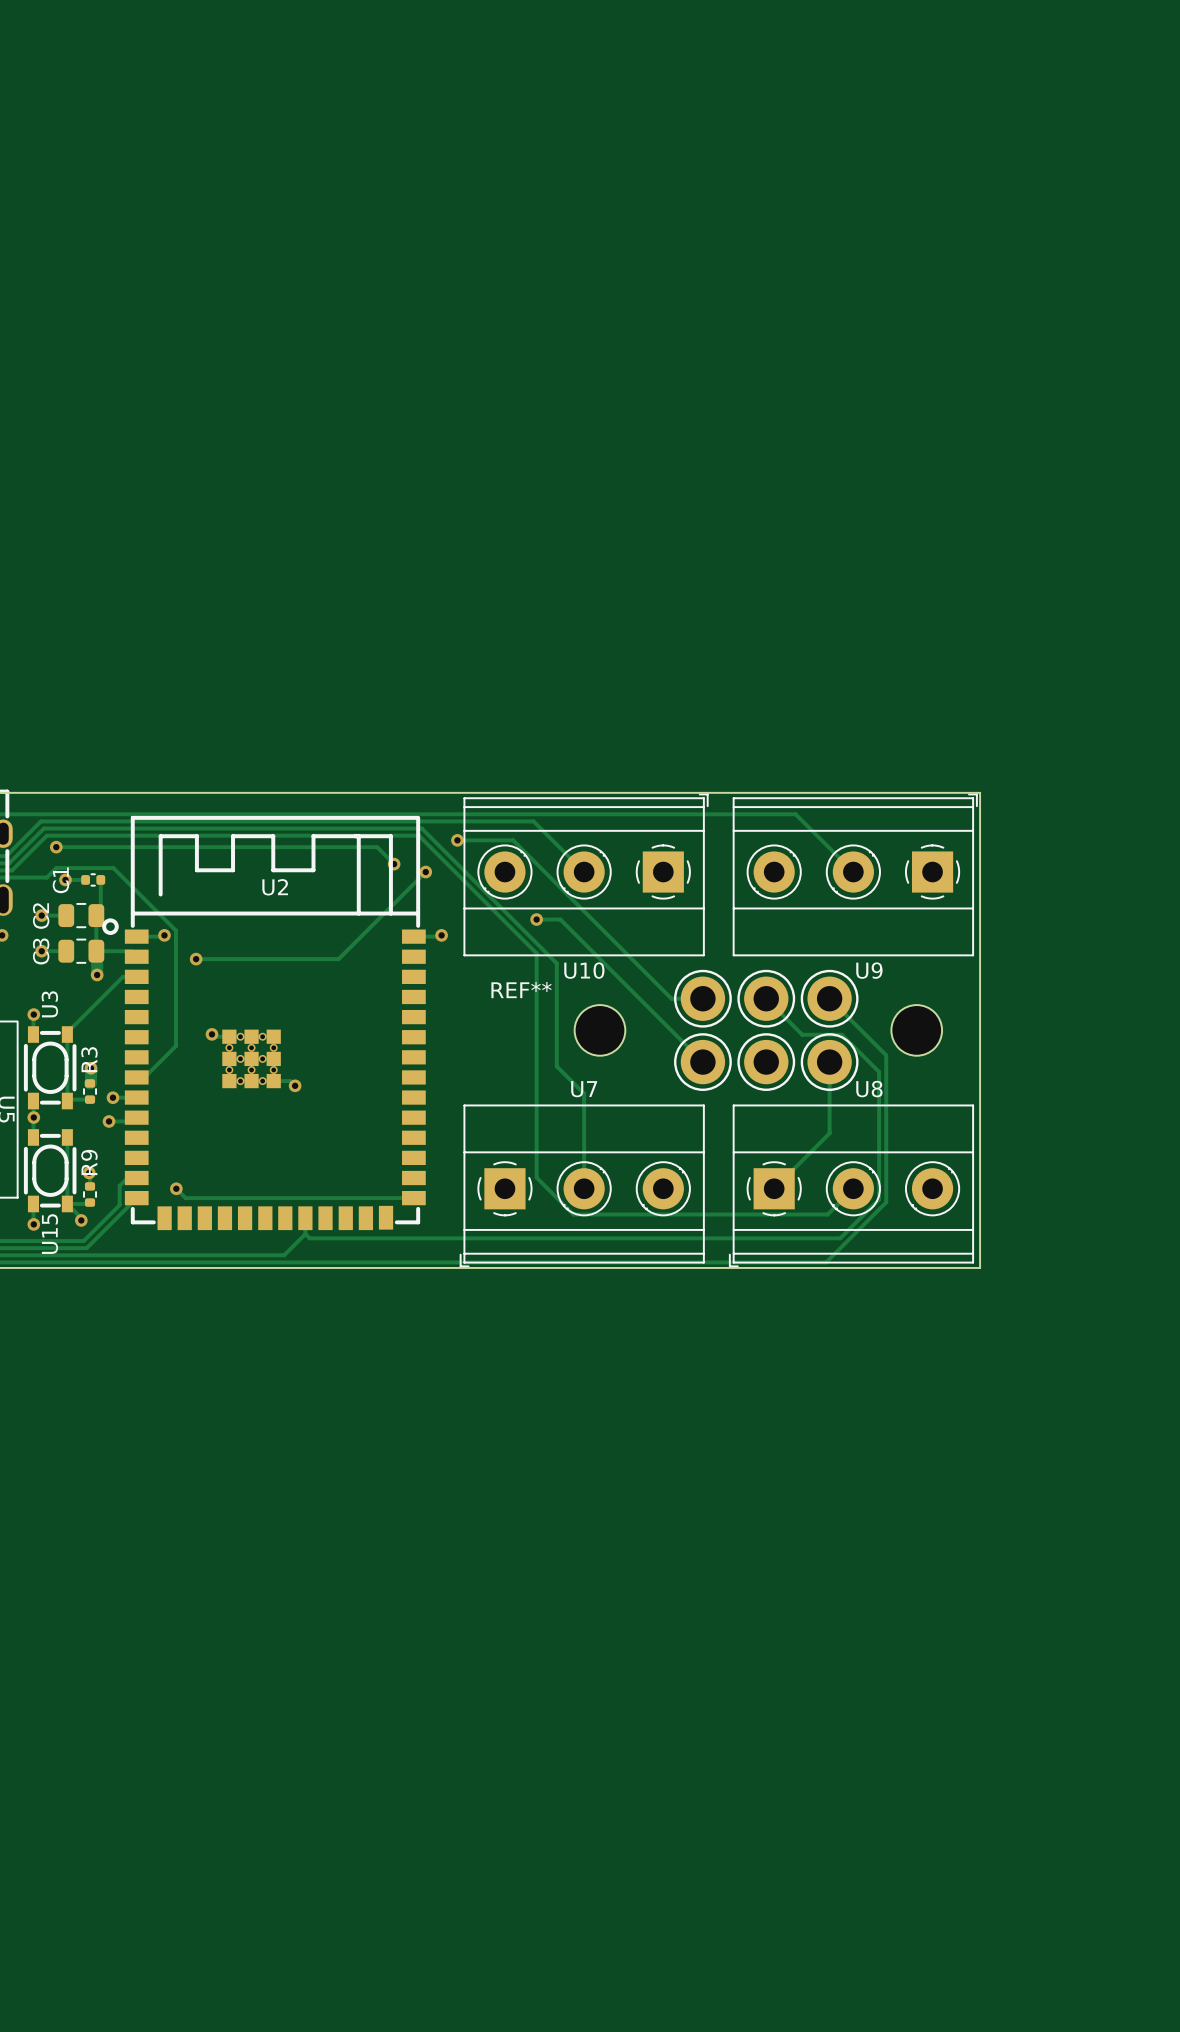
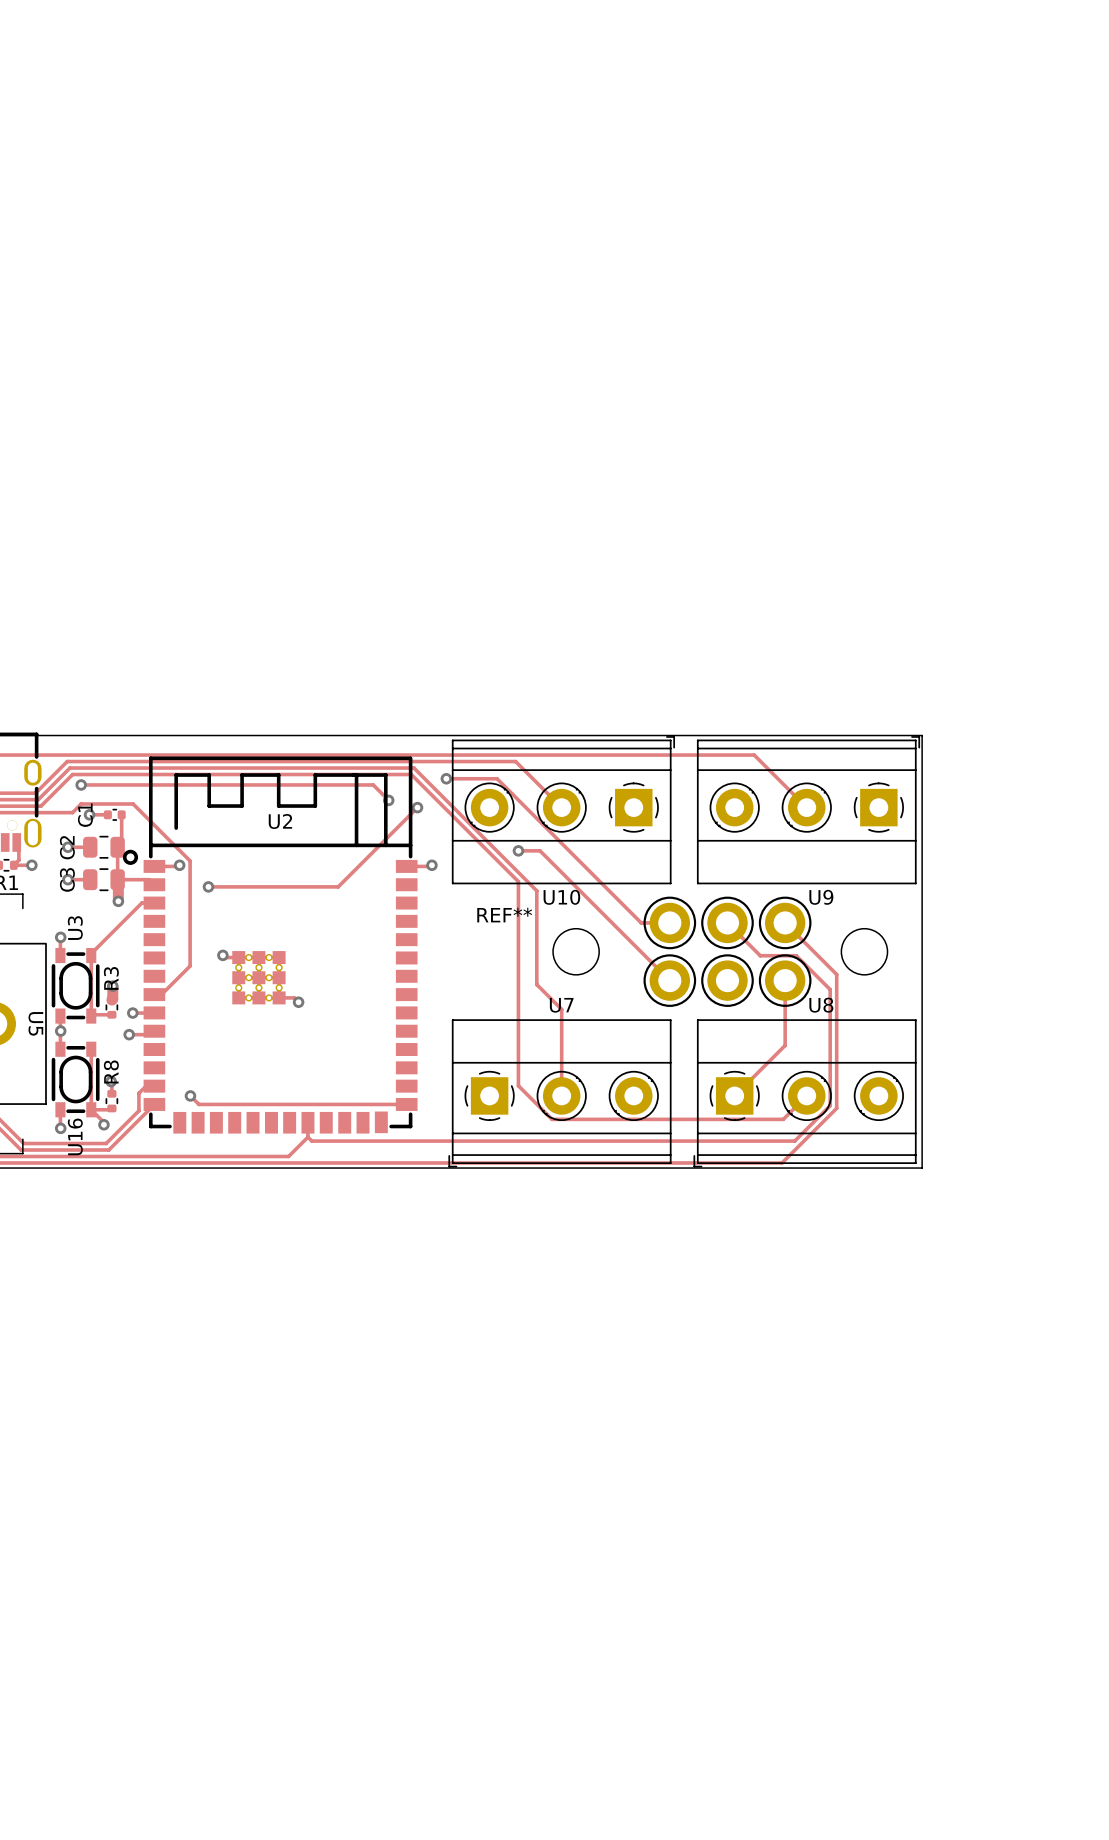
R9 name: R9 (89, 1162) -> R8 (111, 1072)
U15 name: U15 (49, 1234) -> U16 (75, 1136)

